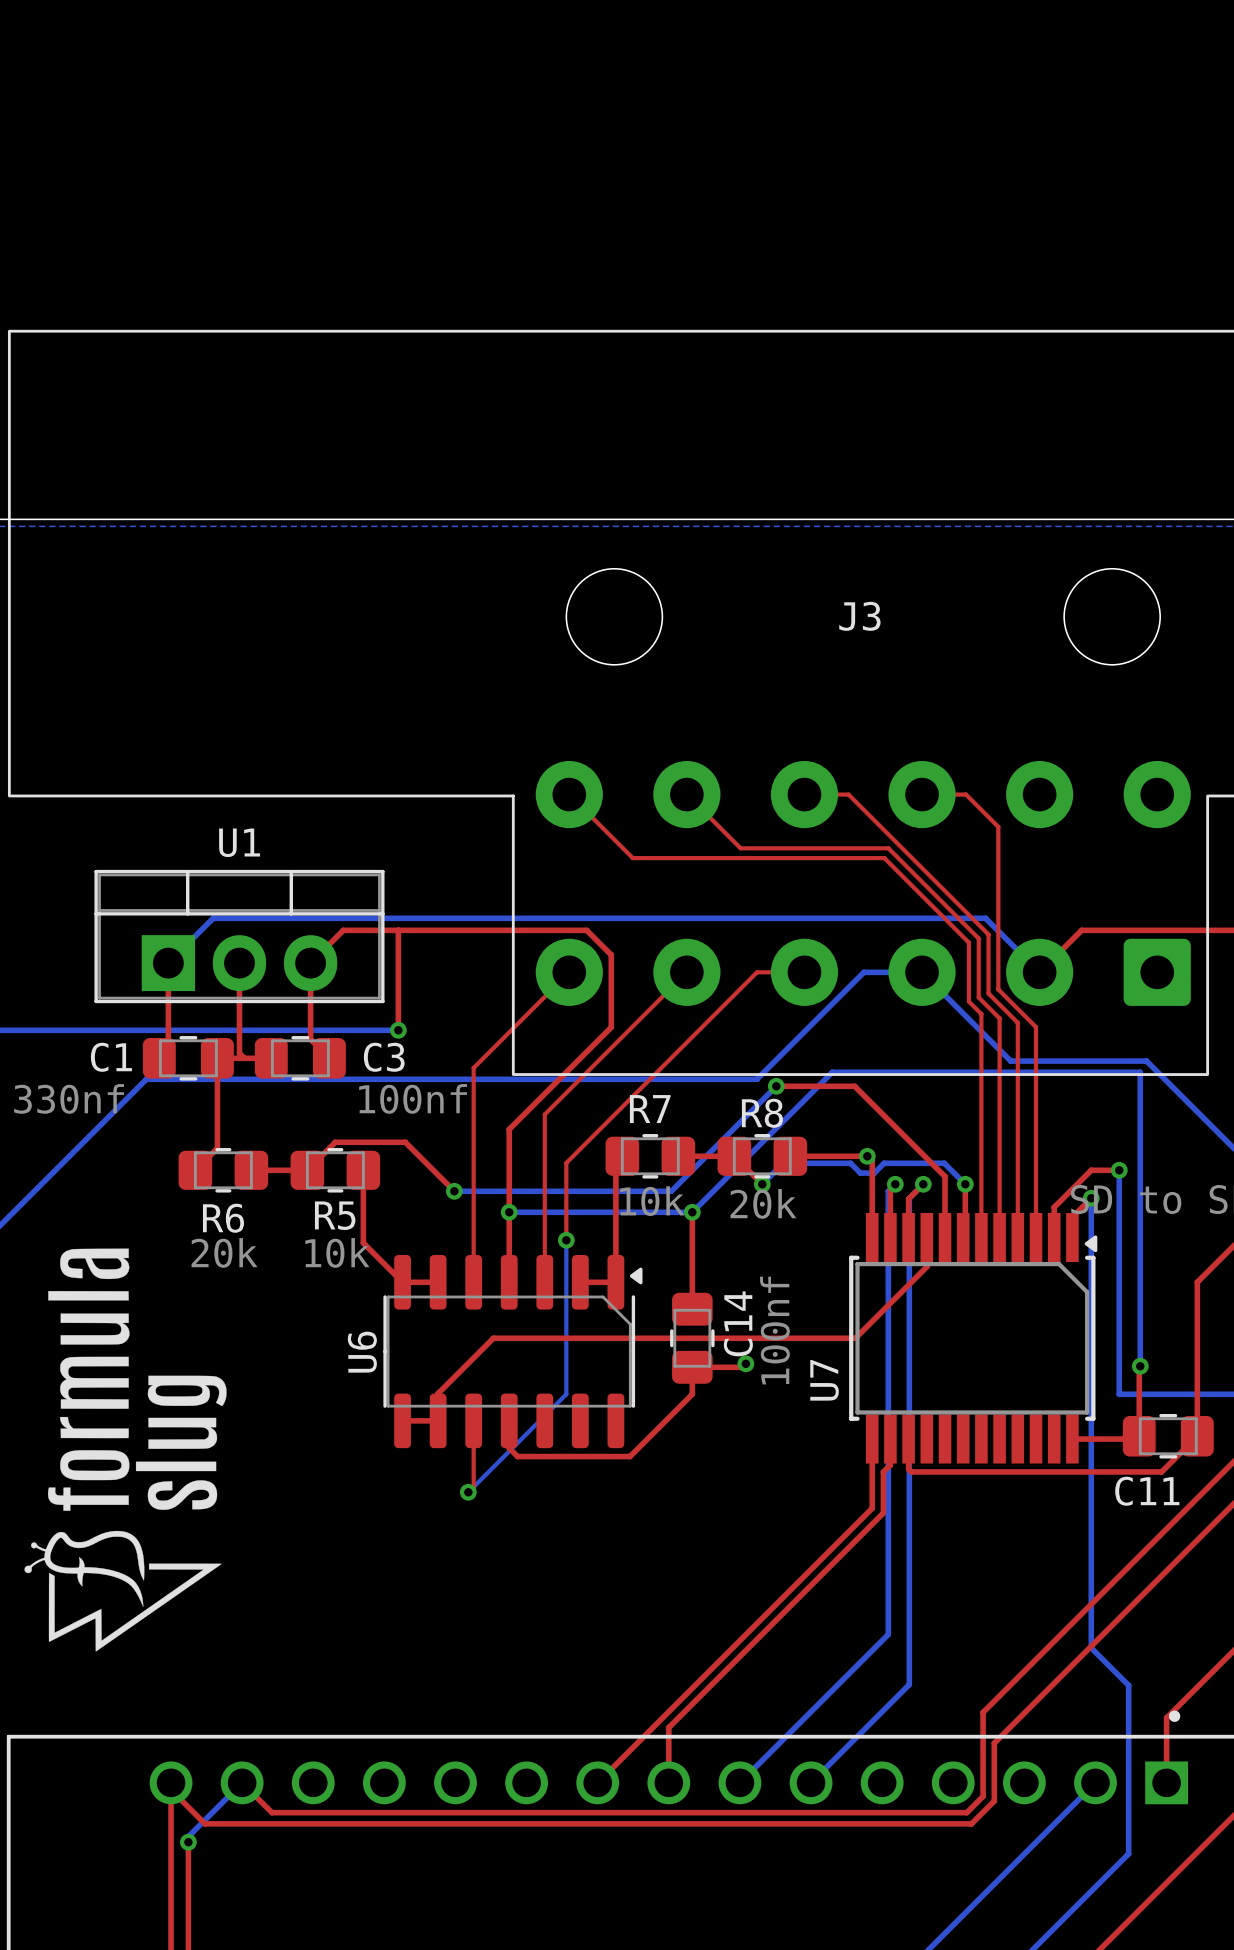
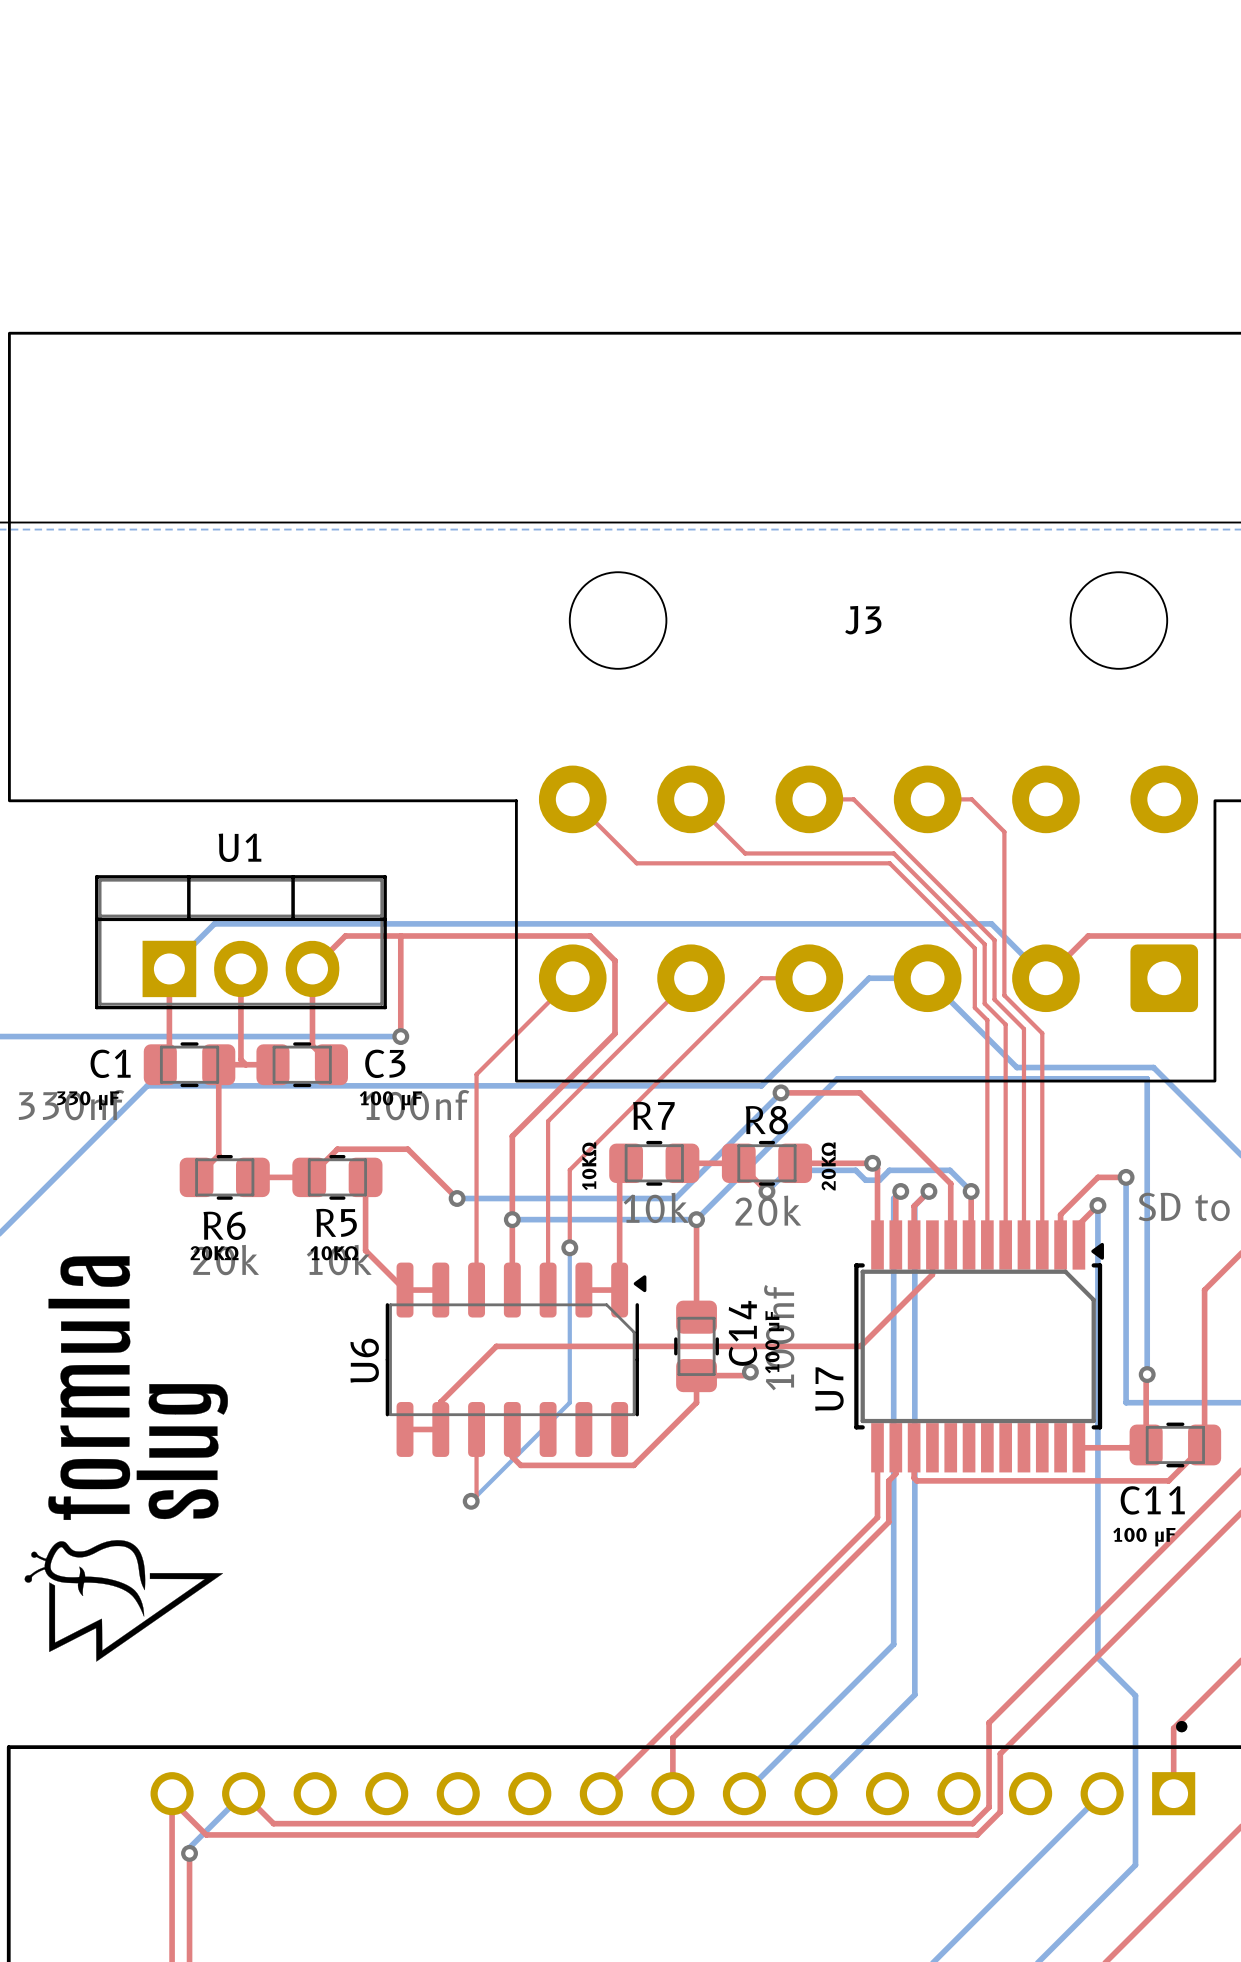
text: none -> 330 μF (88, 1100)
text: none -> 100 μF (390, 1100)
text: none -> 10KΩ (589, 1166)
text: none -> 20KΩ (828, 1166)
text: none -> 20KΩ (214, 1253)
text: none -> 10KΩ (334, 1253)
text: none -> 100 μF (774, 1342)
text: none -> 100 μF (1144, 1537)

